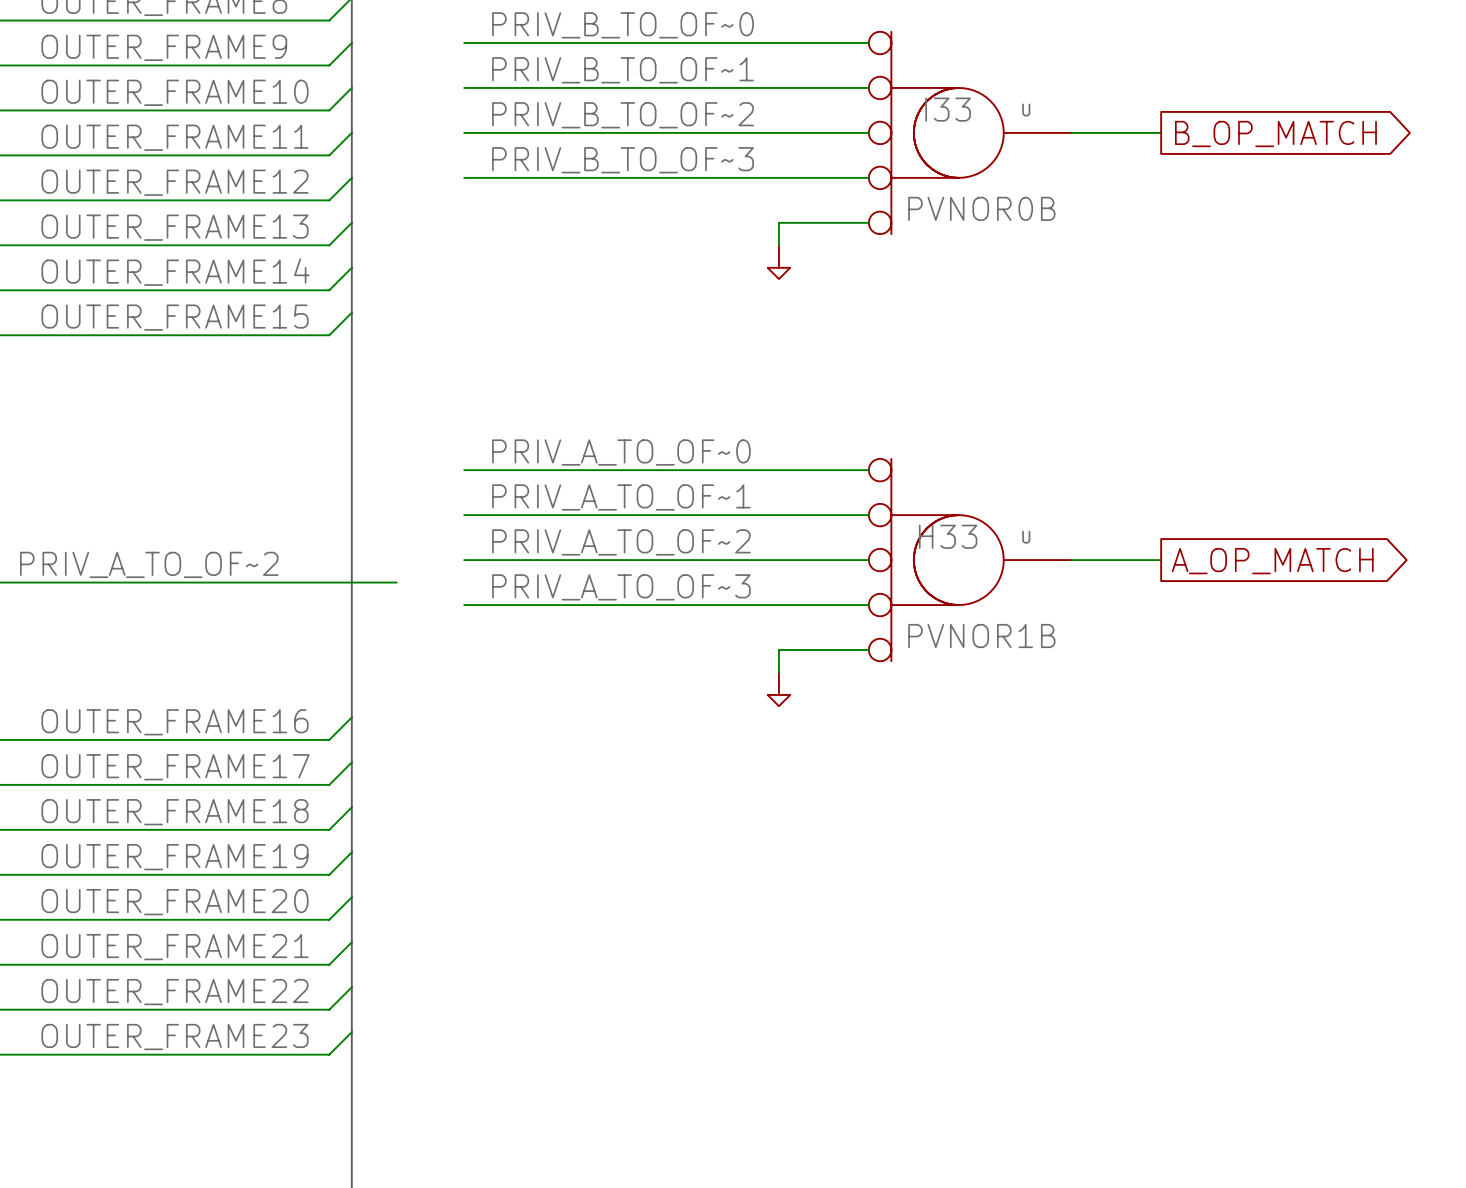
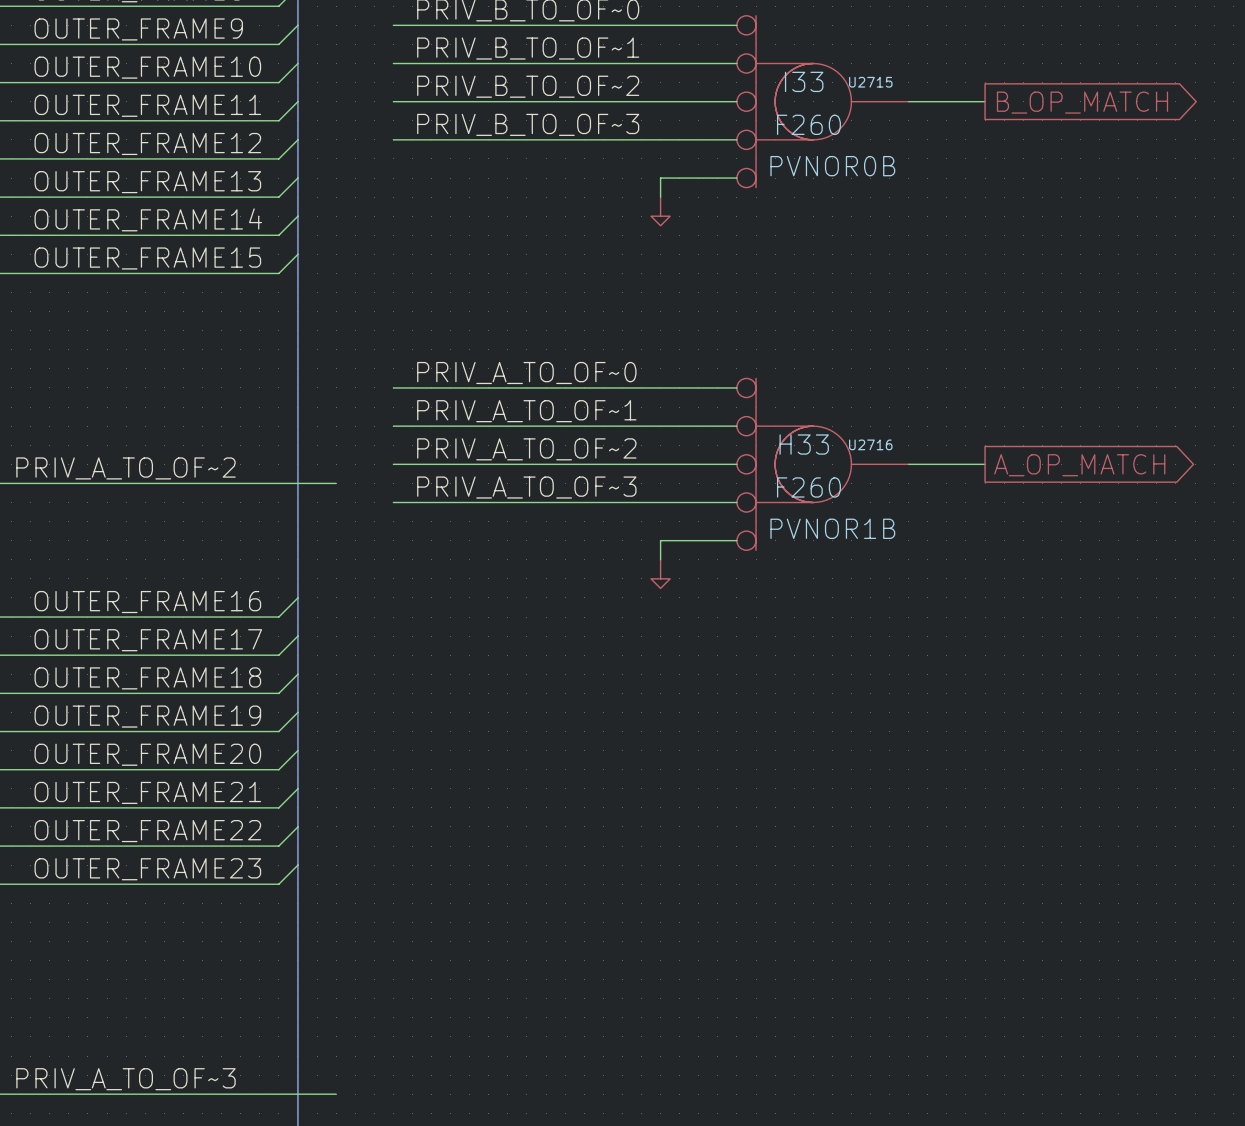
U name: U (1026, 110) -> U2715 (870, 82)
U value: none -> F260 (808, 124)
U name: U (1026, 537) -> U2716 (870, 444)
U value: none -> F260 (808, 487)

